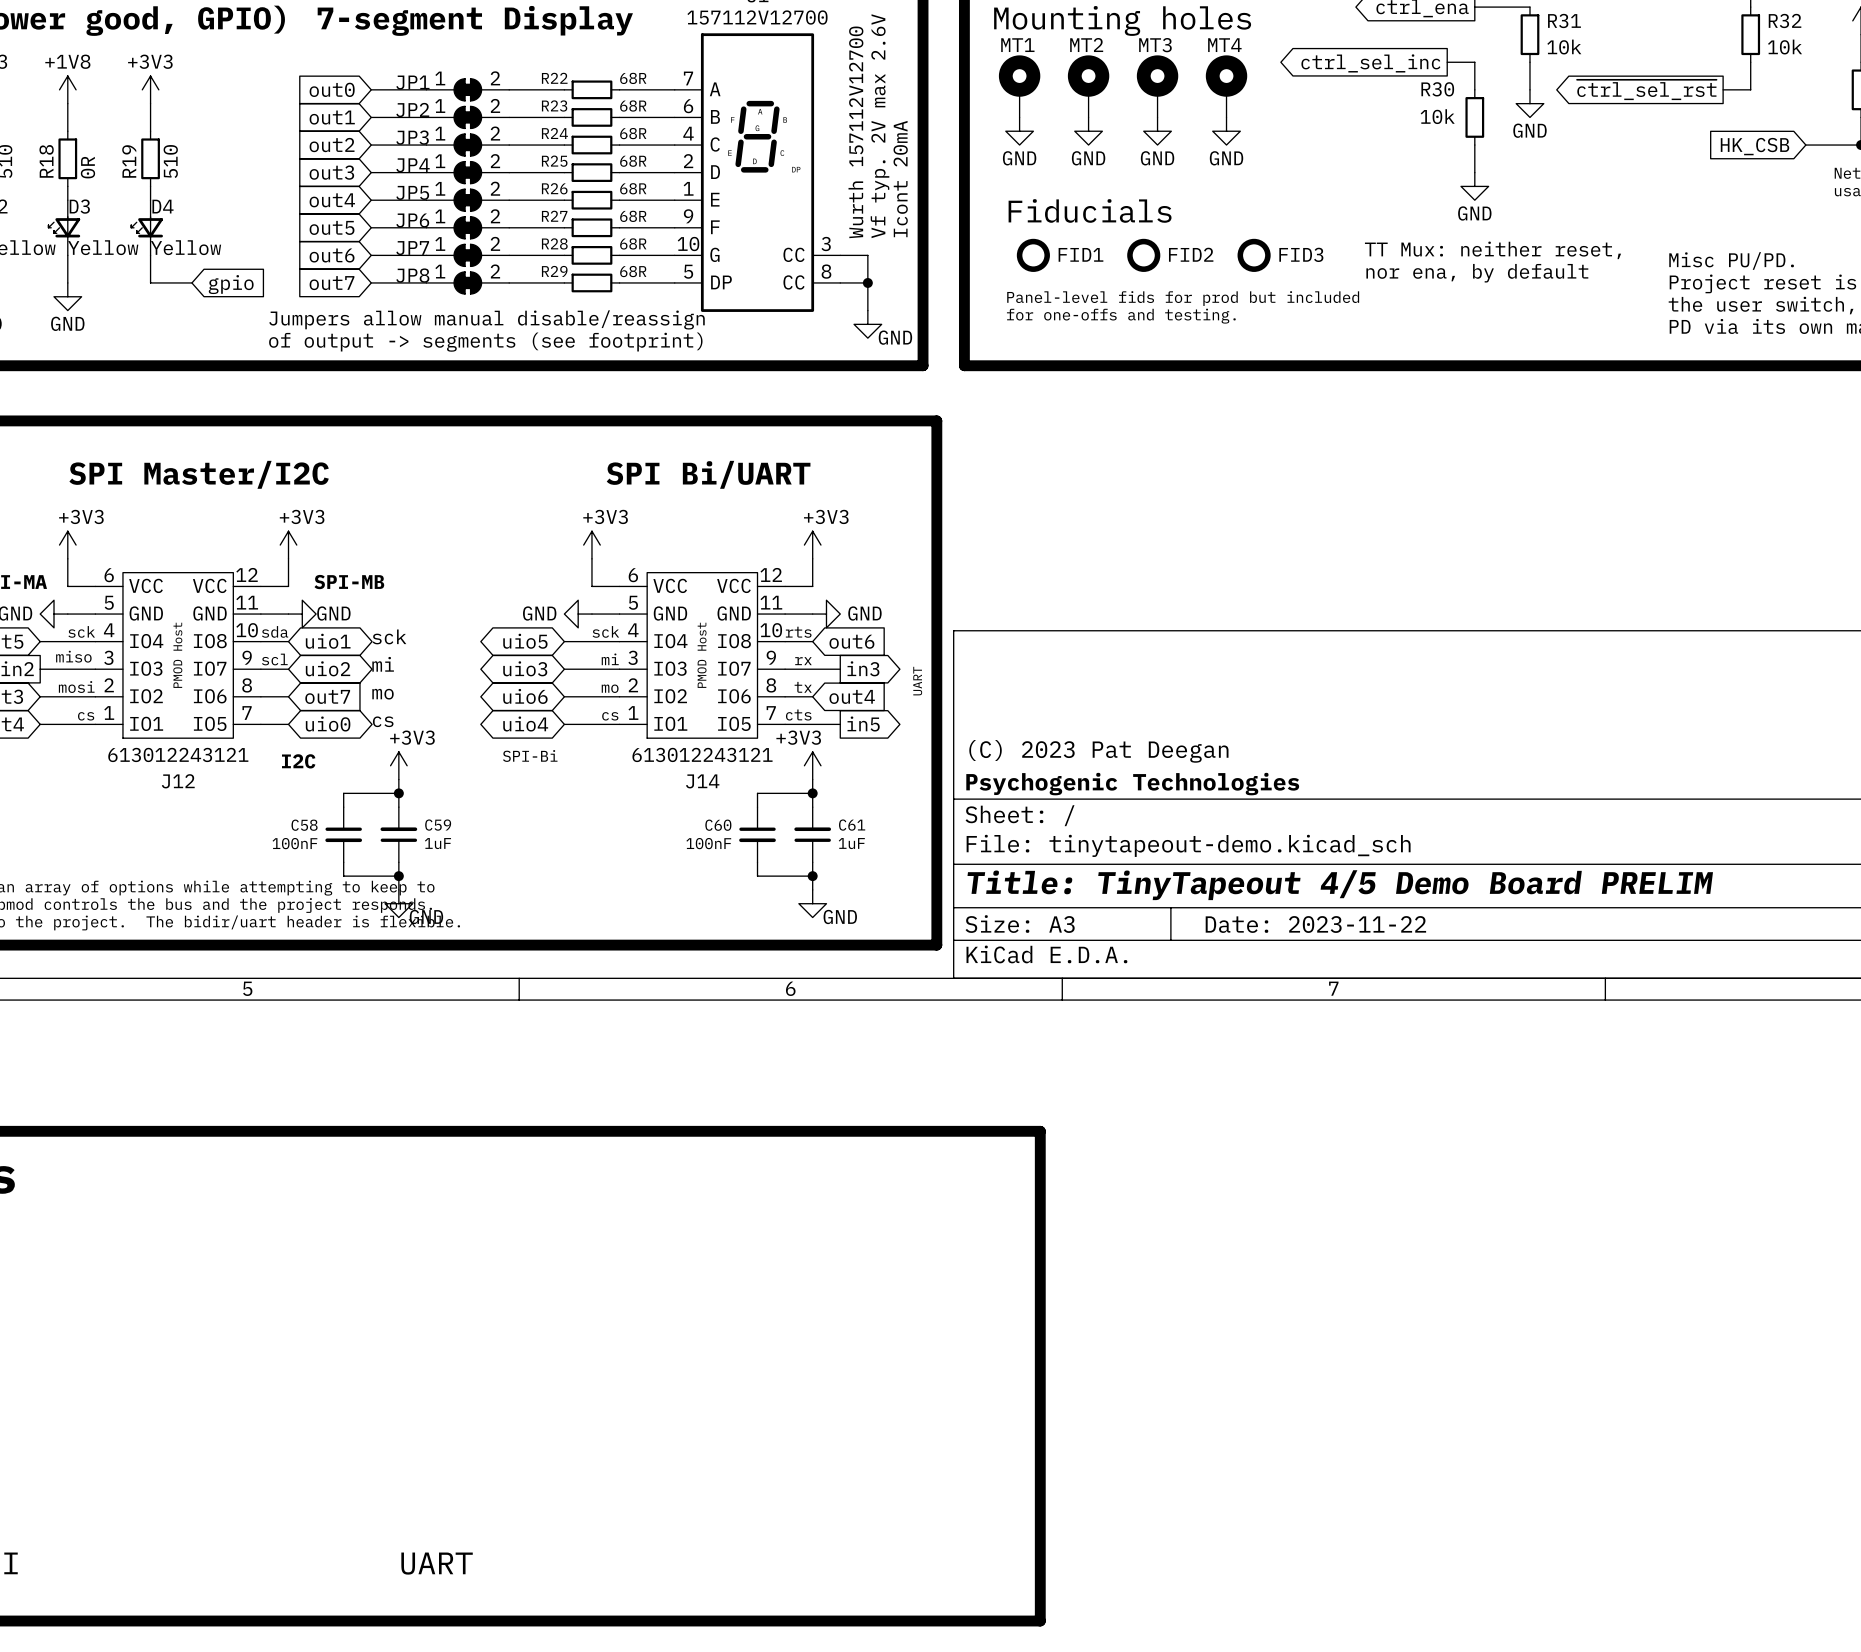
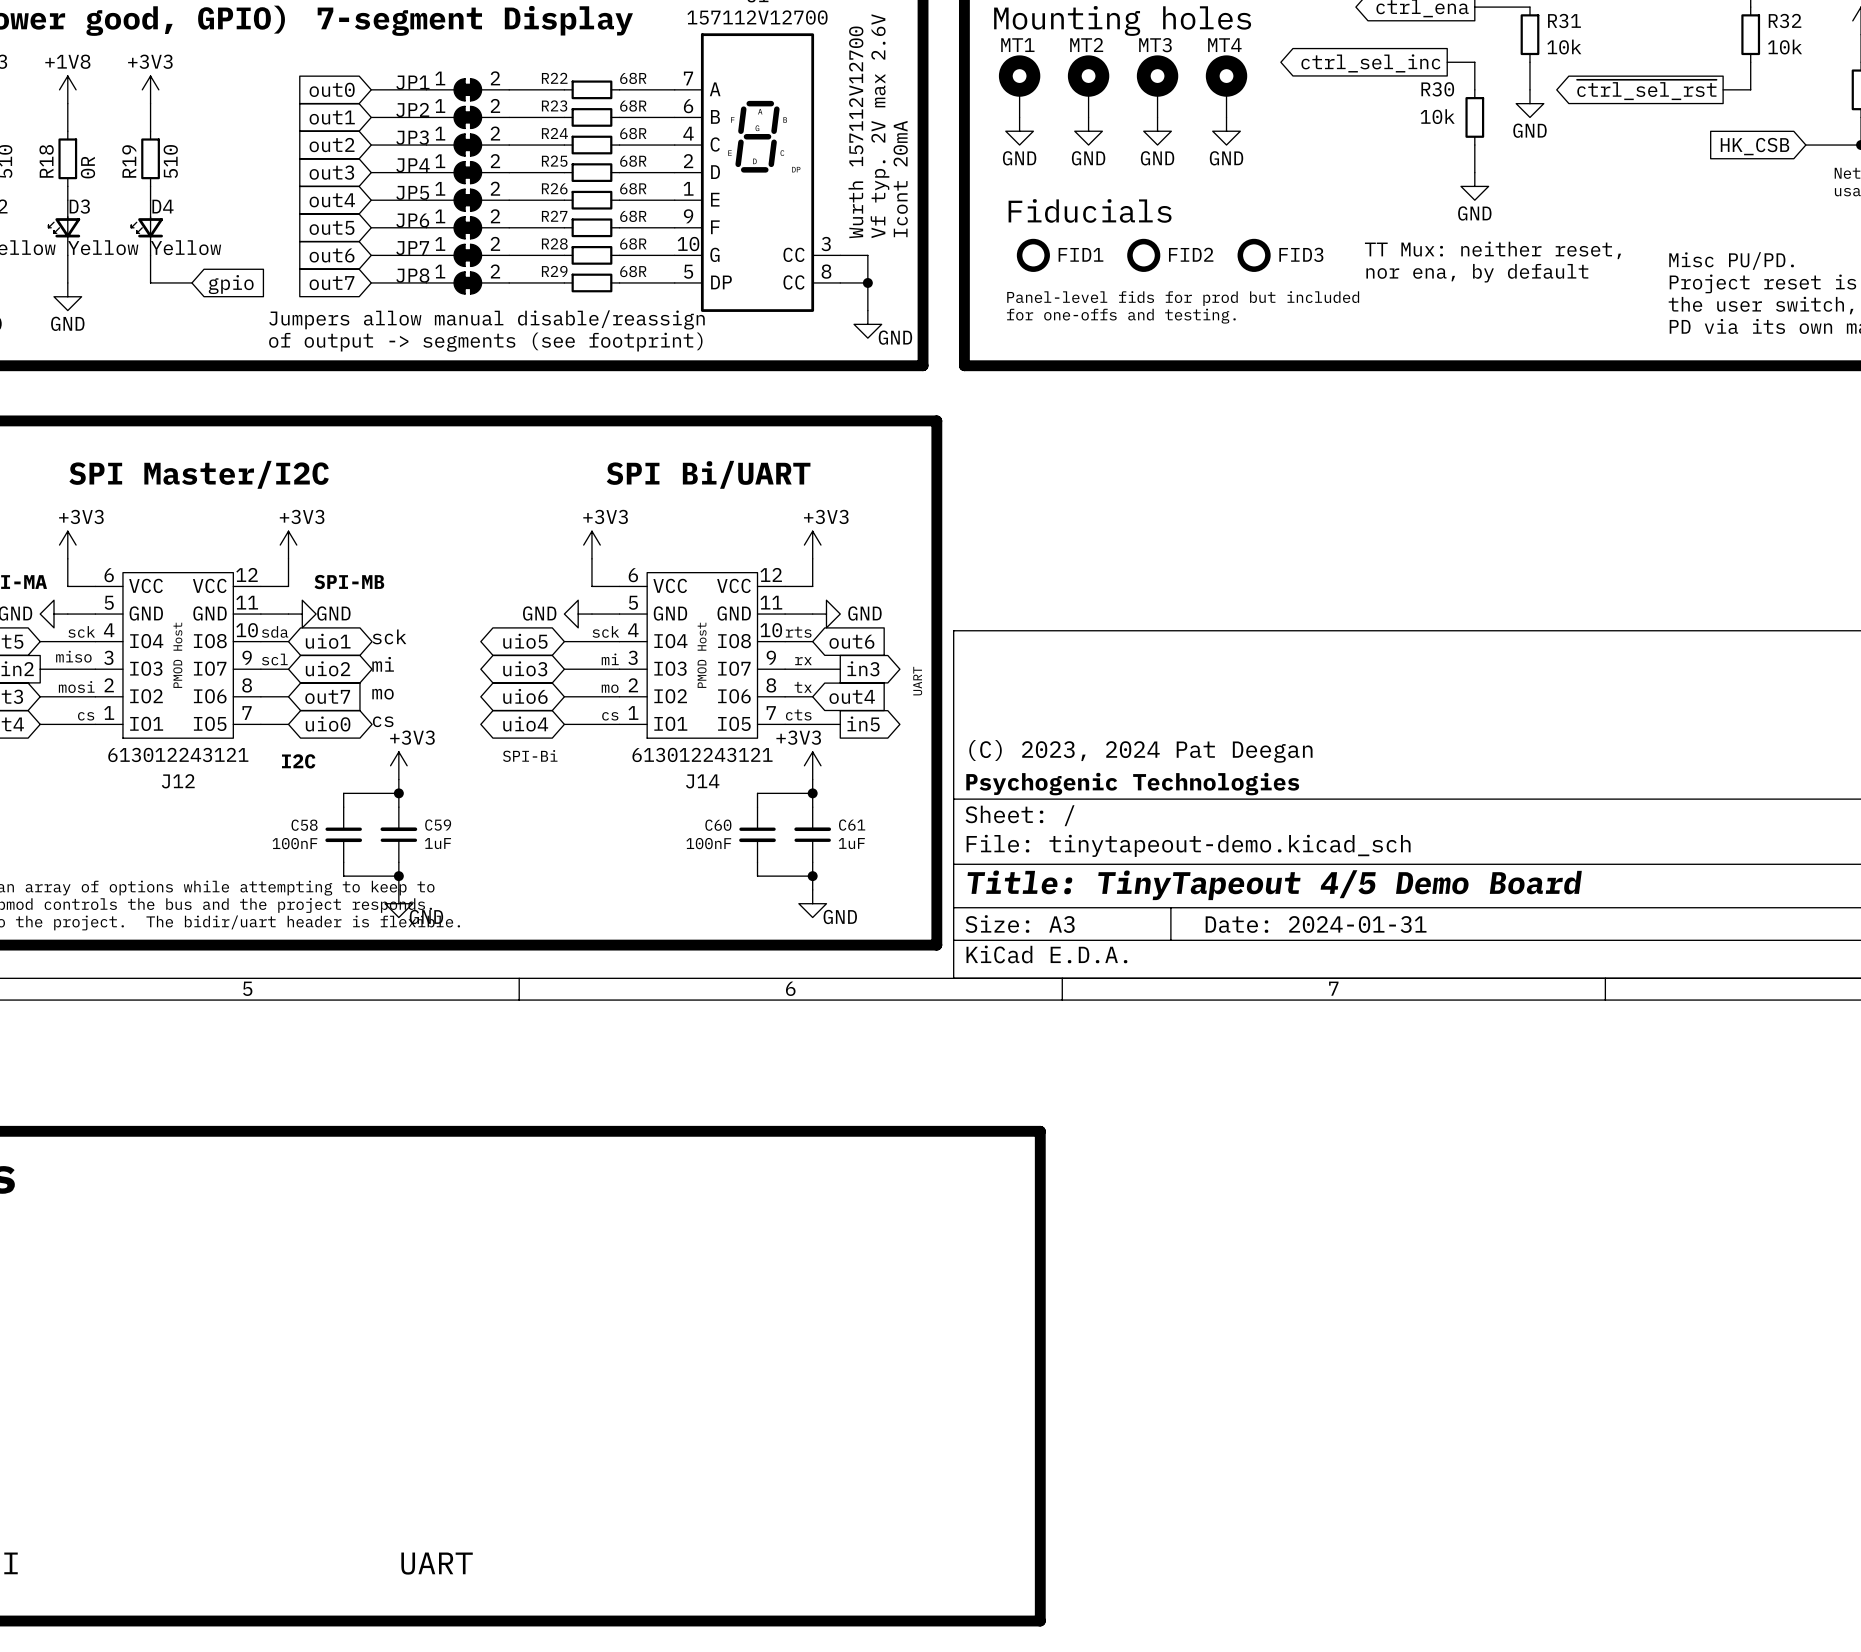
title block: (C) 2023 Pat Deegan (1098, 751) -> (C) 2023, 2024 Pat Deegan (1140, 751)
title block: Title: TinyTapeout 4/5 Demo Board PRELIM (1340, 885) -> Title: TinyTapeout 4/5 Demo Board (1274, 885)
title block: Date: 2023-11-22 (1315, 924) -> Date: 2024-01-31 (1316, 924)

